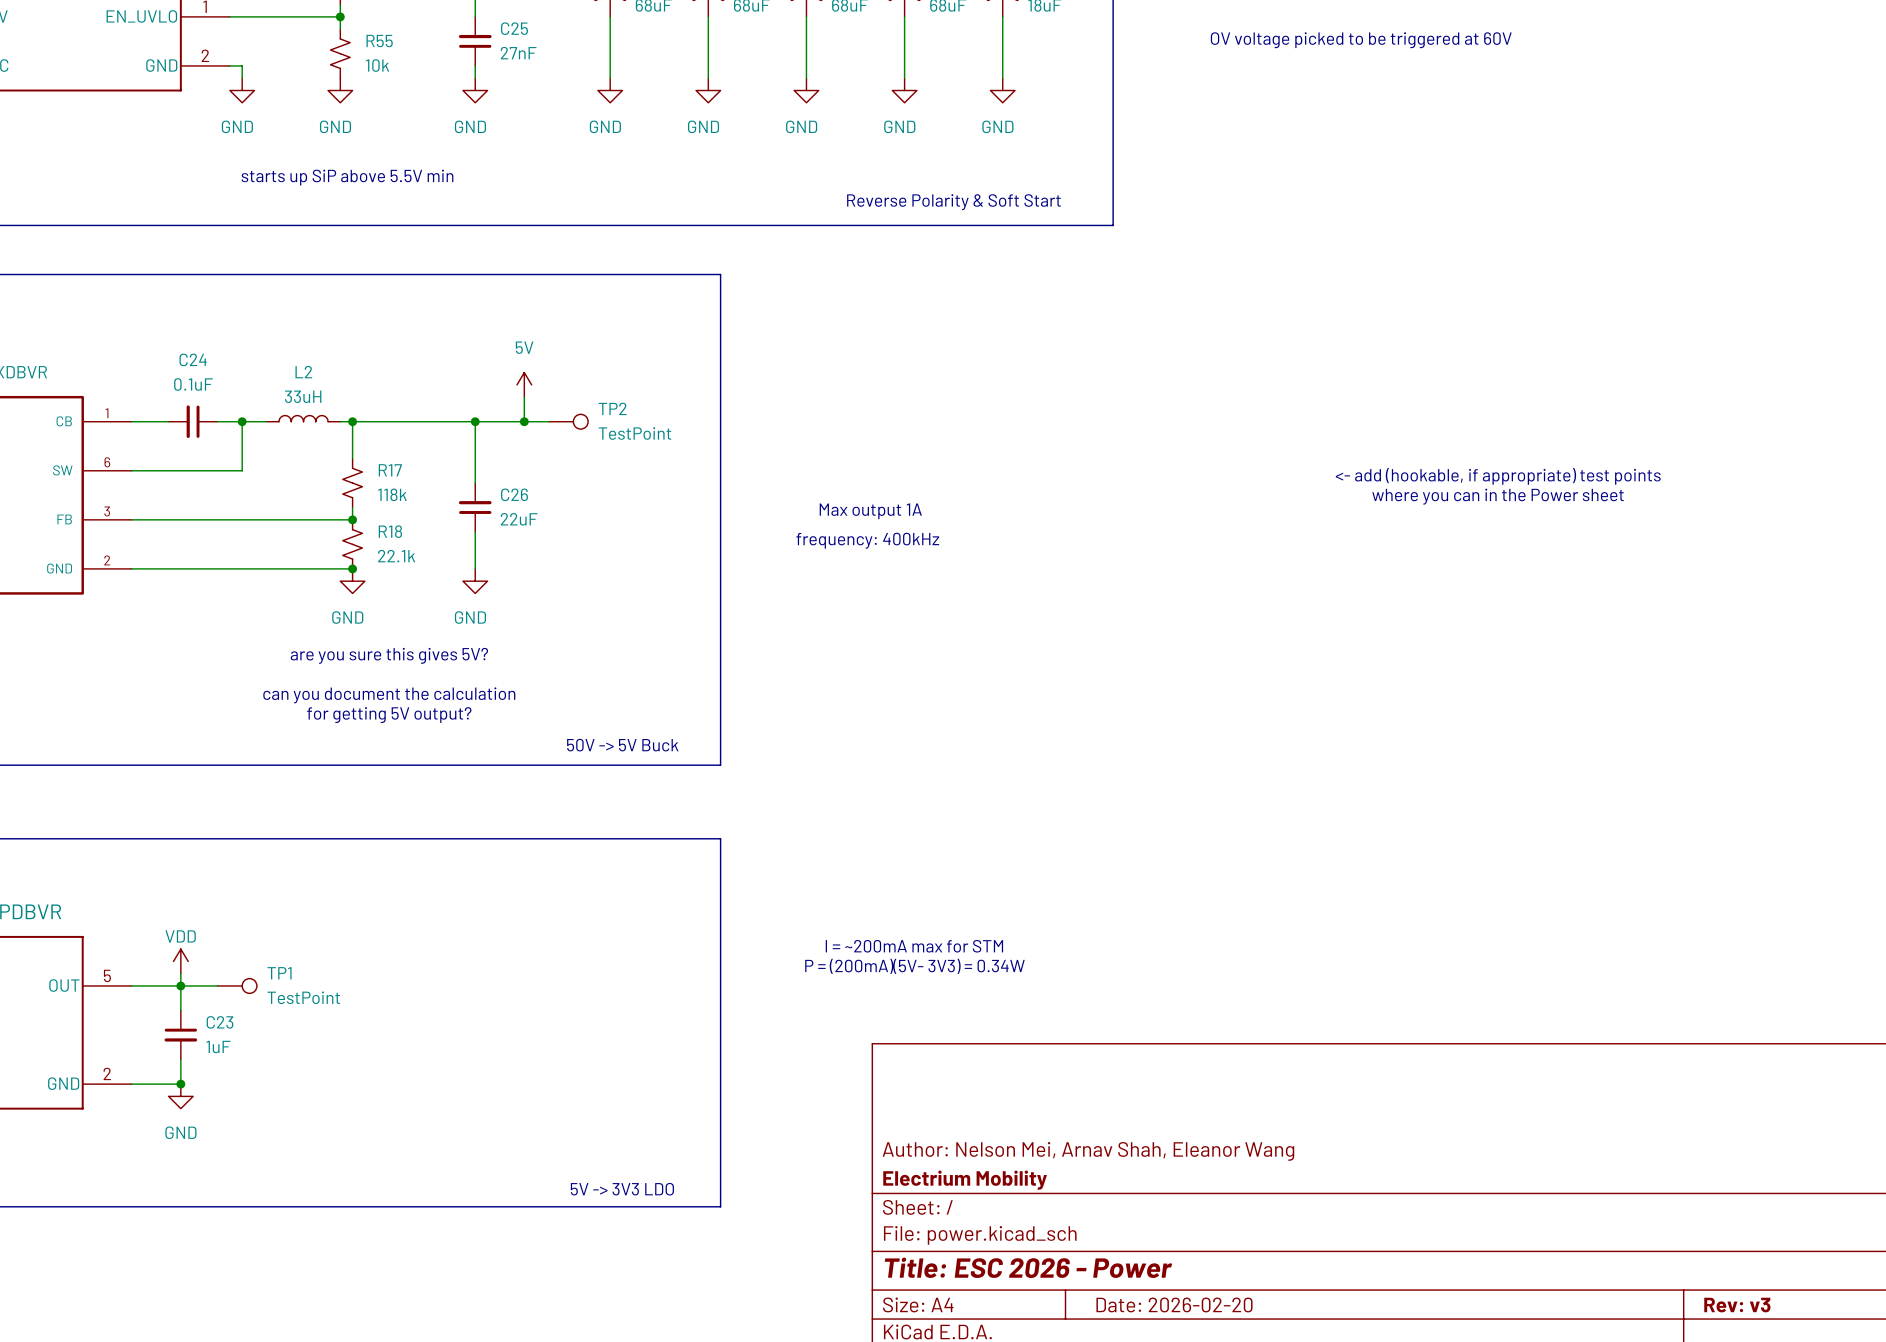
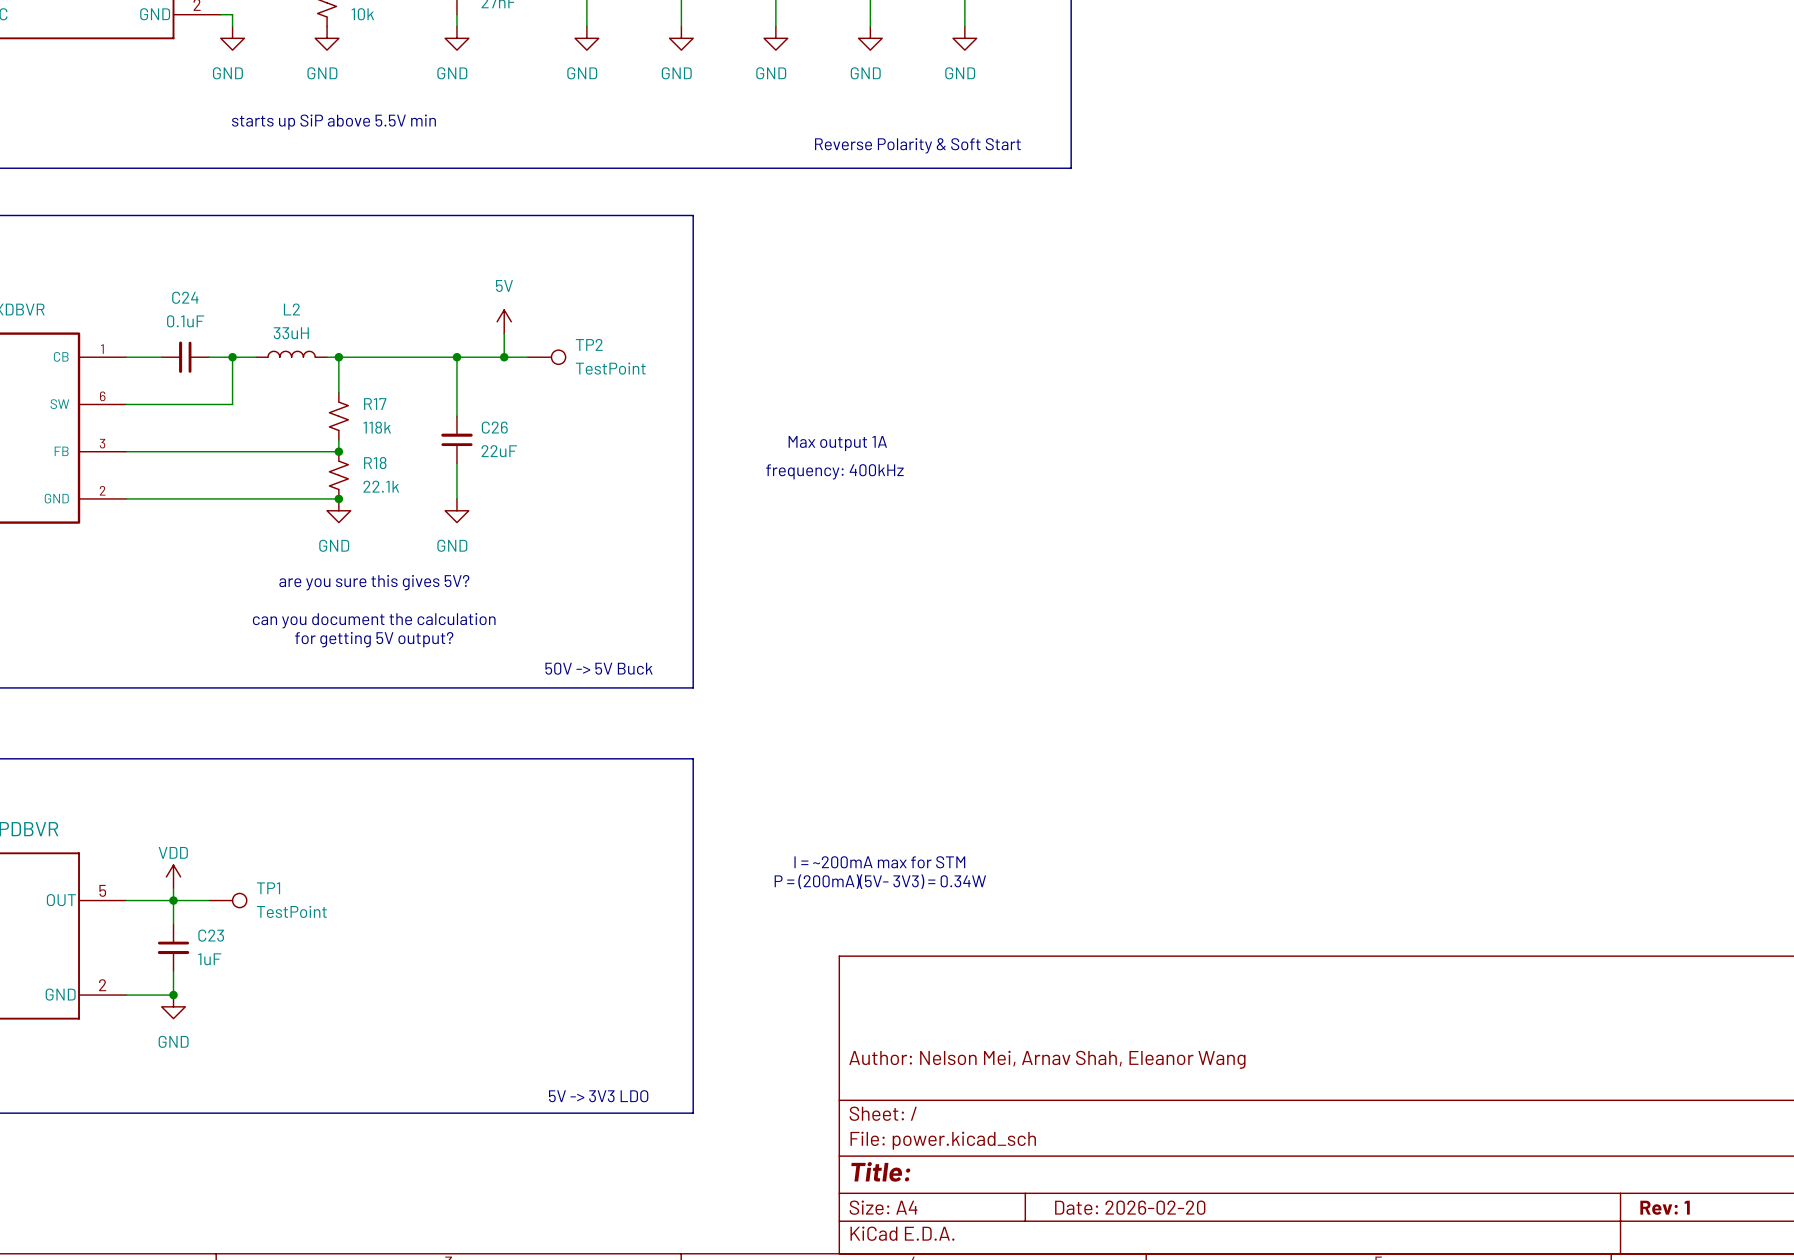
text: <- add (hookable, if appropriate) test points (1498, 476) -> none
text: where you can in the Power sheet (1498, 496) -> none
title block: Electrium Mobility (965, 1180) -> none
title block: Title: ESC 2026 - Power (1028, 1267) -> Title: (880, 1171)
title block: Rev: v3 (1737, 1305) -> Rev: 1 (1665, 1207)

